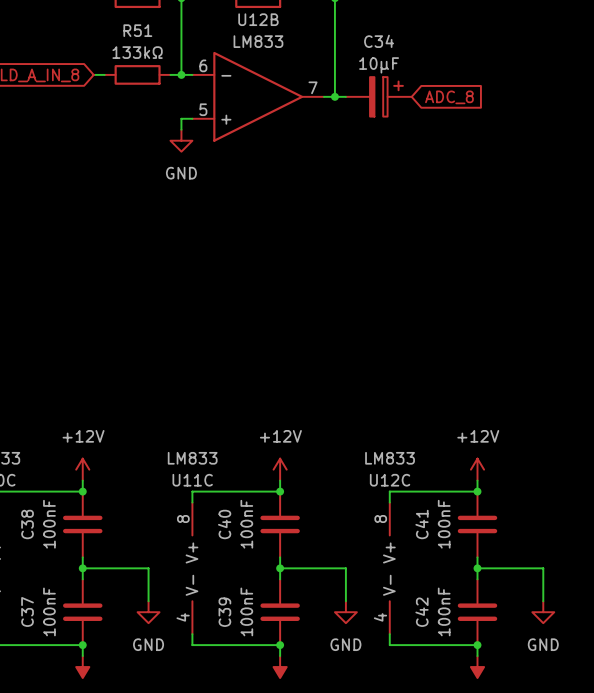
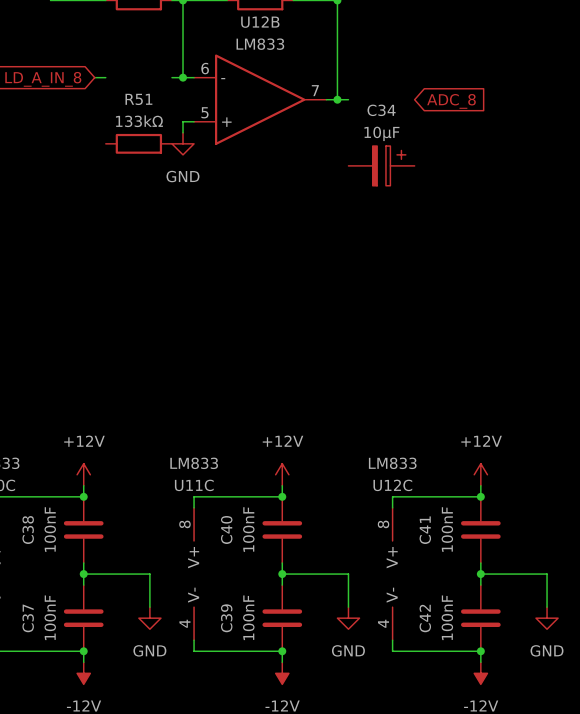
R51 position: (137, 74) -> (138, 143)
C34 position: (378, 96) -> (381, 165)

